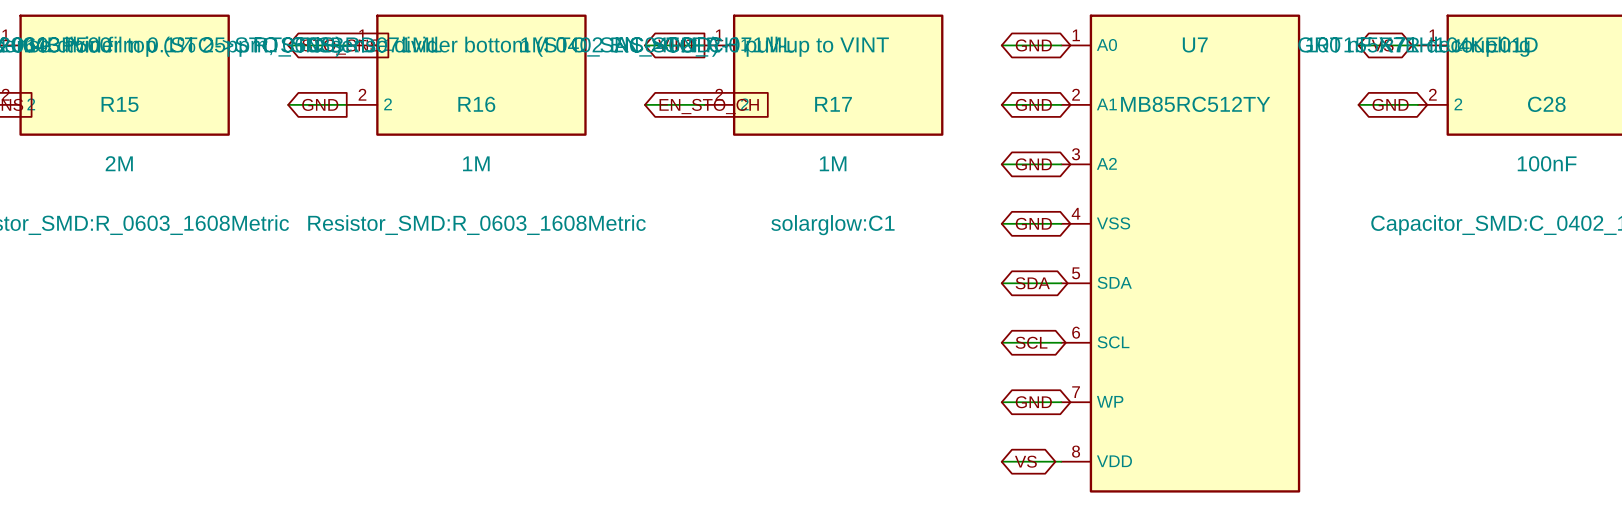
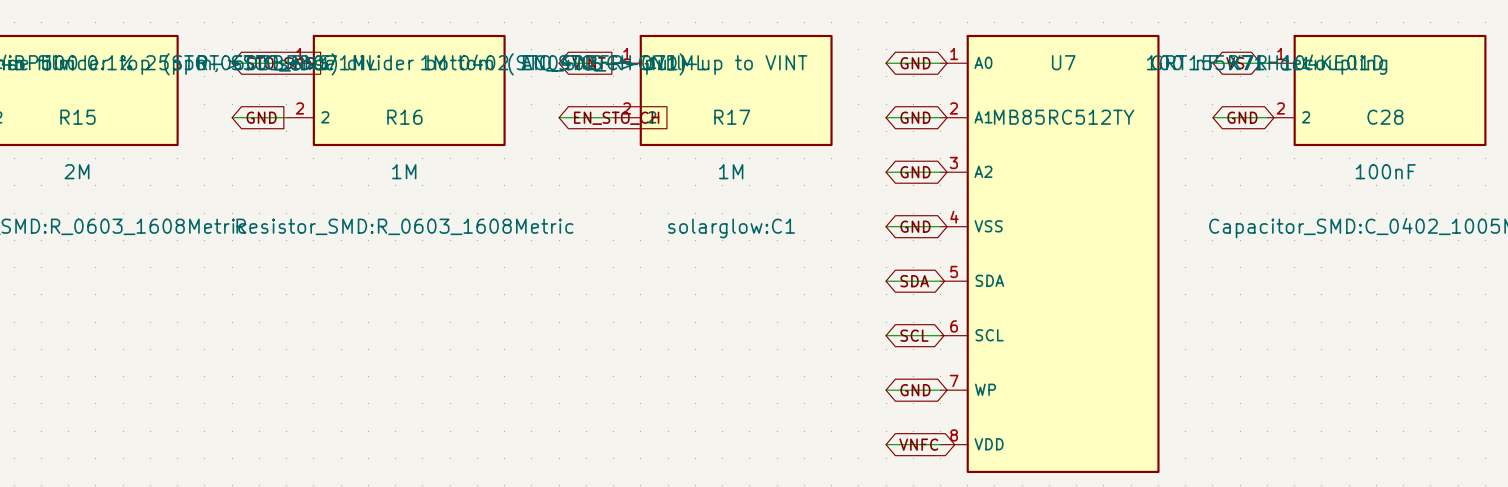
global label: VS (1025, 461) -> VNFC (918, 444)

